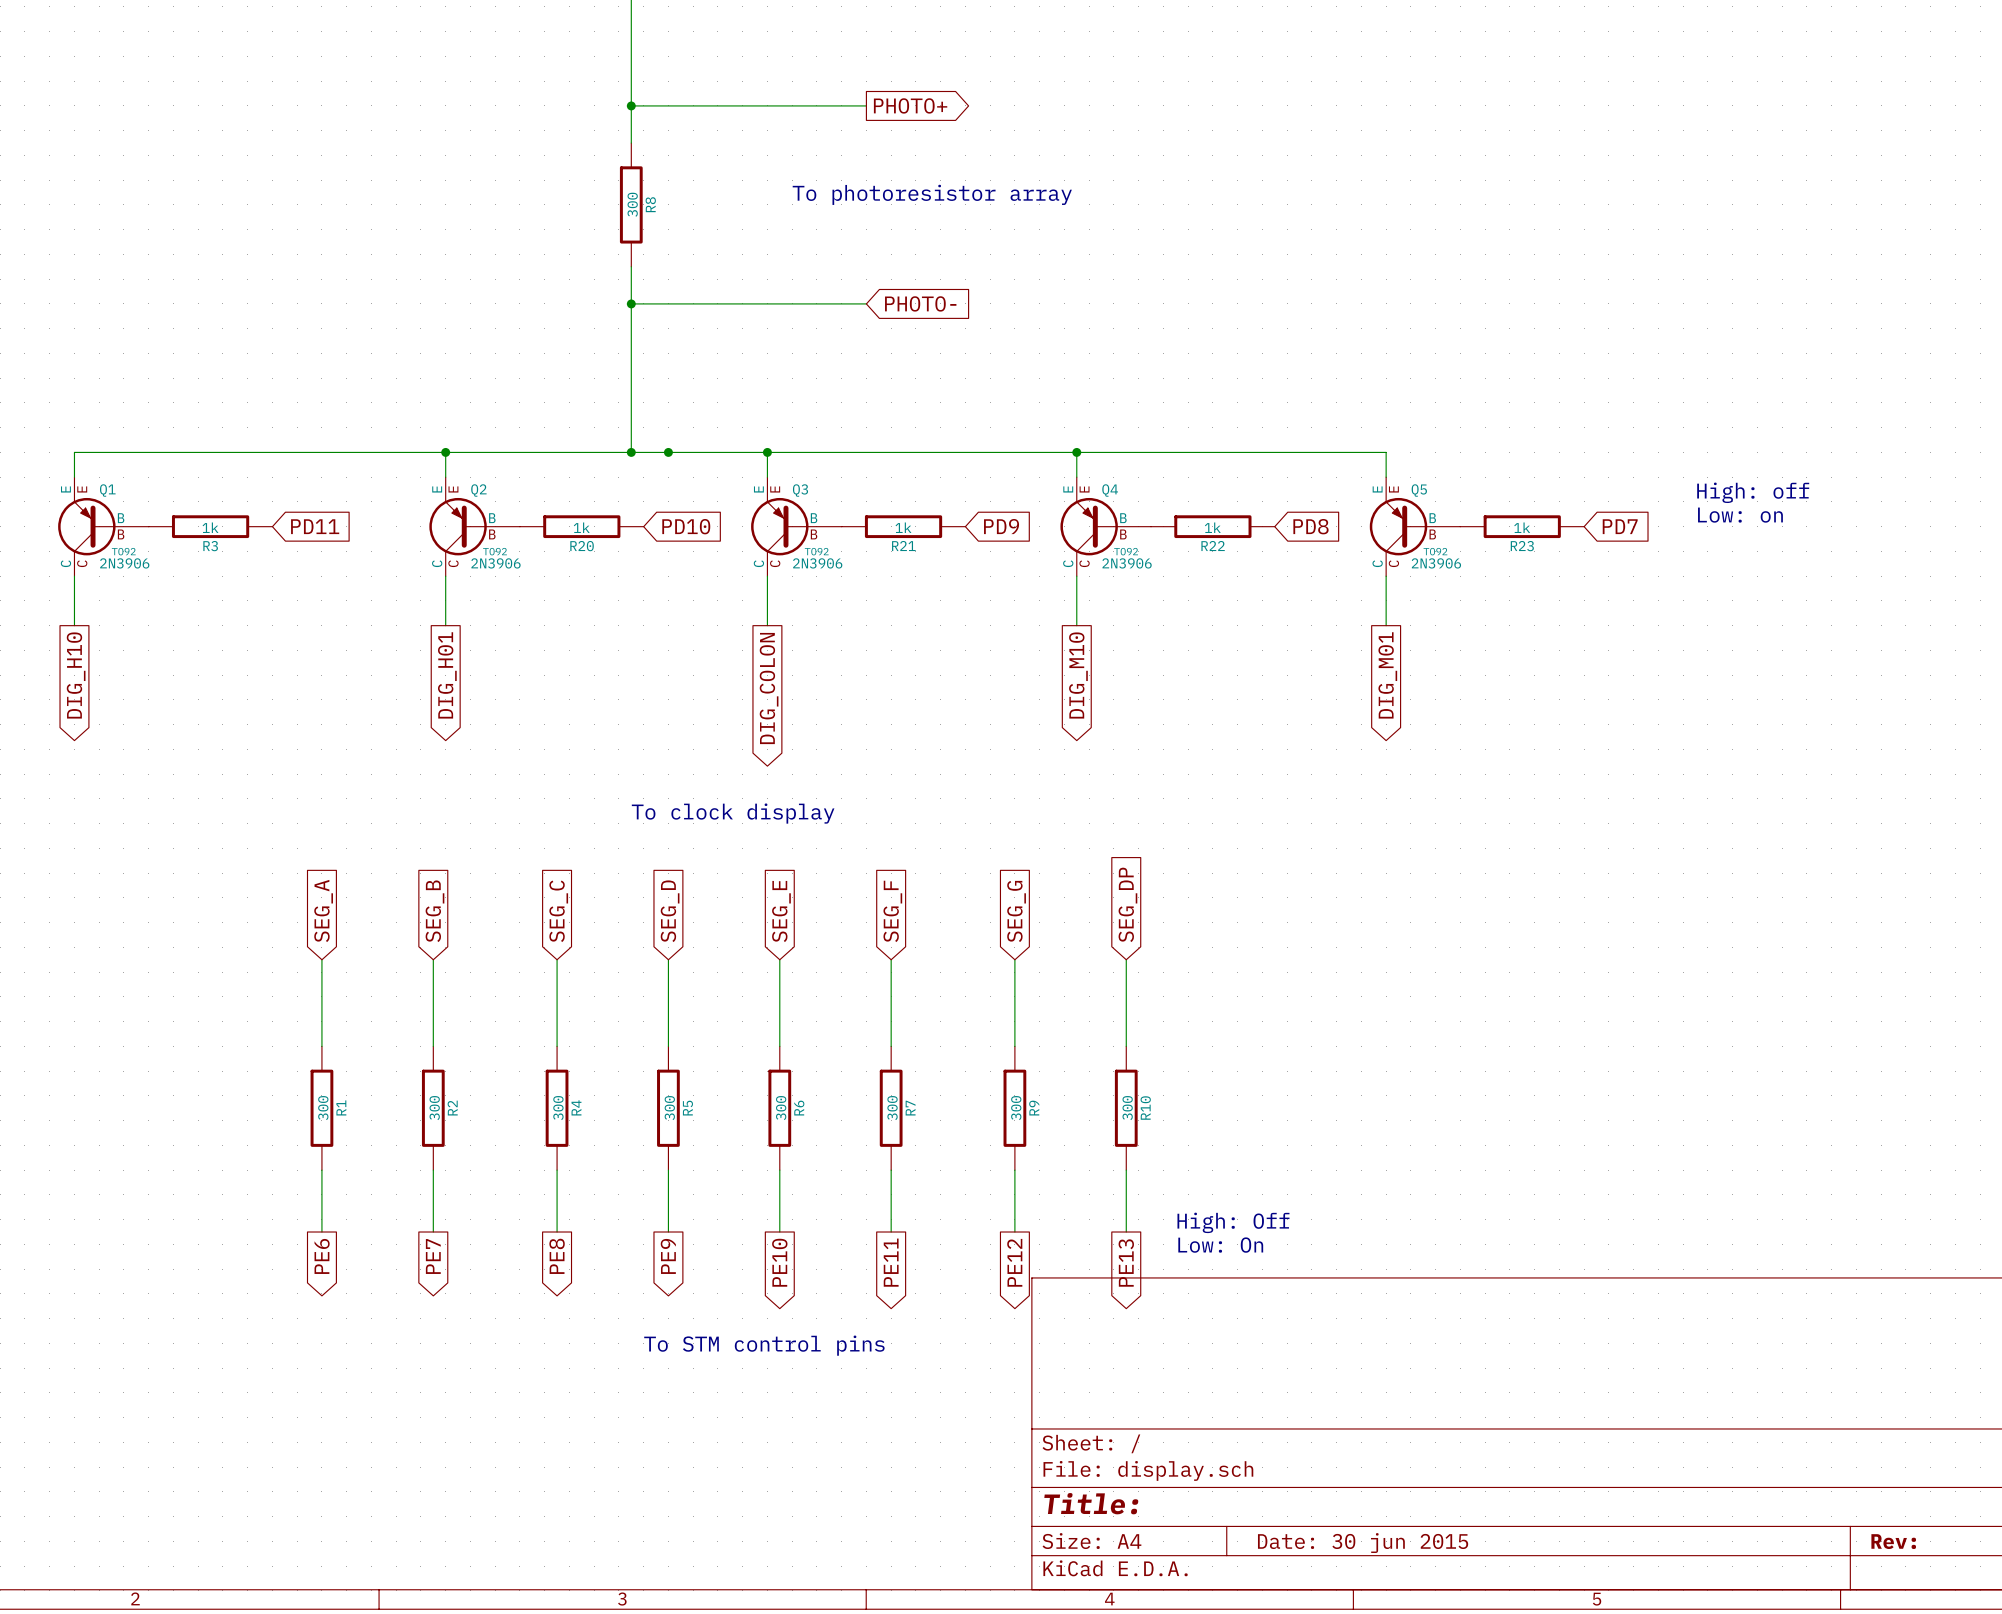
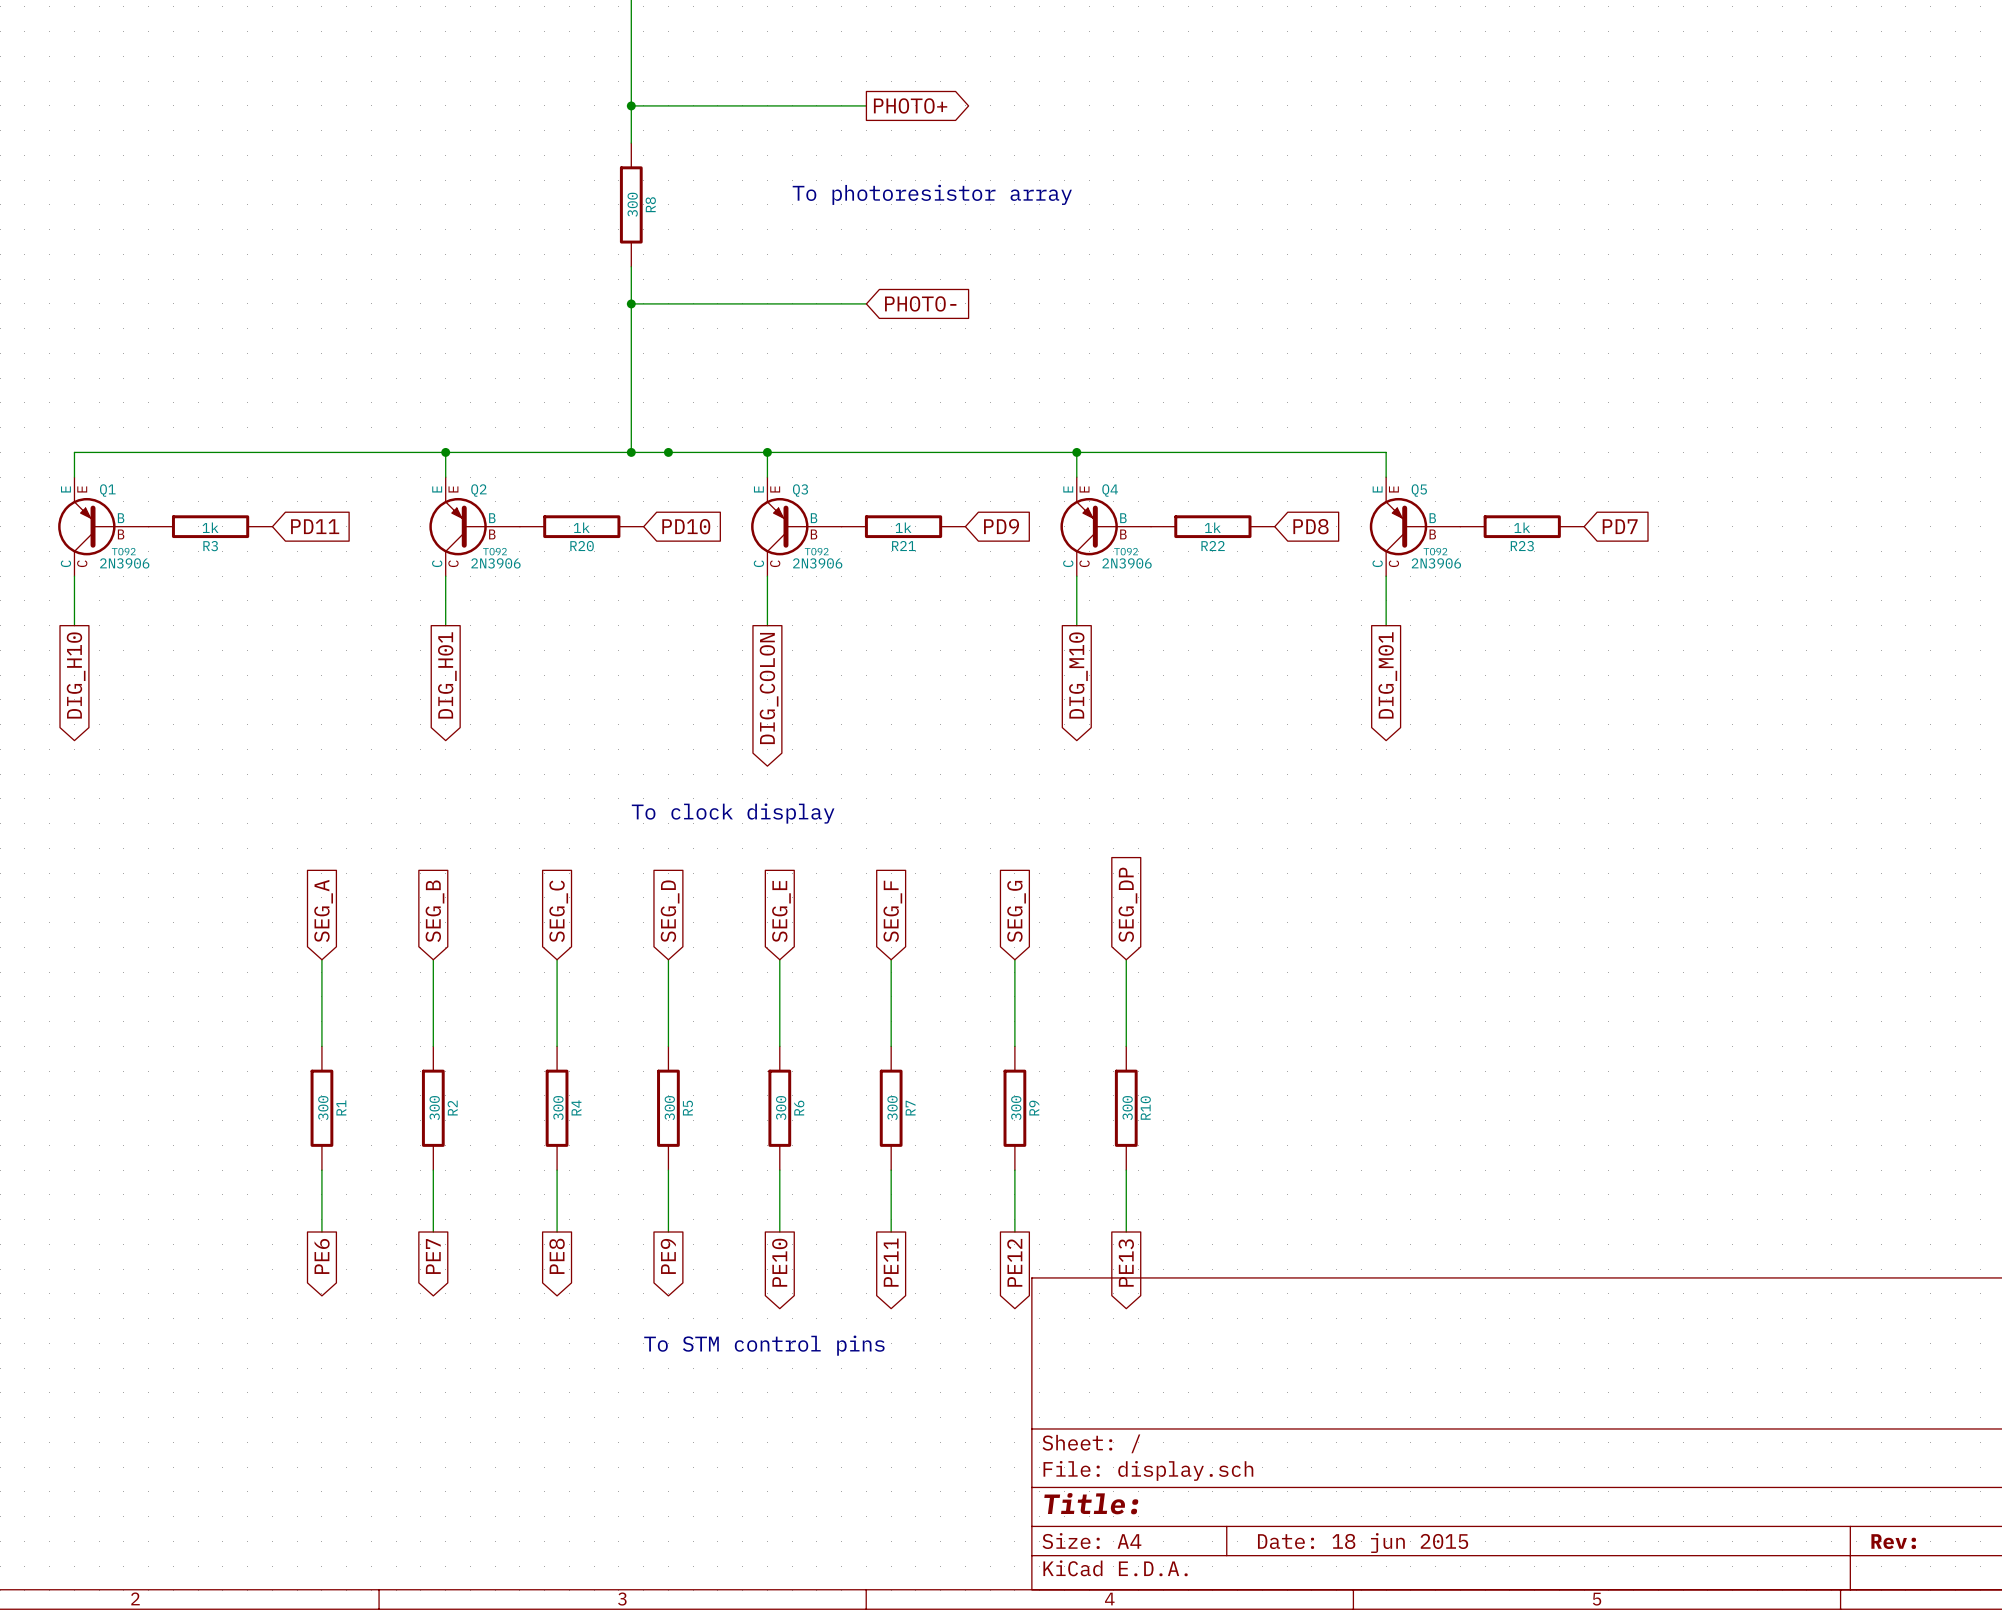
text: High: off (1753, 492) -> none
text: Low: on (1740, 515) -> none
text: High: Off (1233, 1222) -> none
text: Low: On (1220, 1245) -> none
title block: Date: 30 jun 2015 (1363, 1543) -> Date: 18 jun 2015 (1363, 1543)

